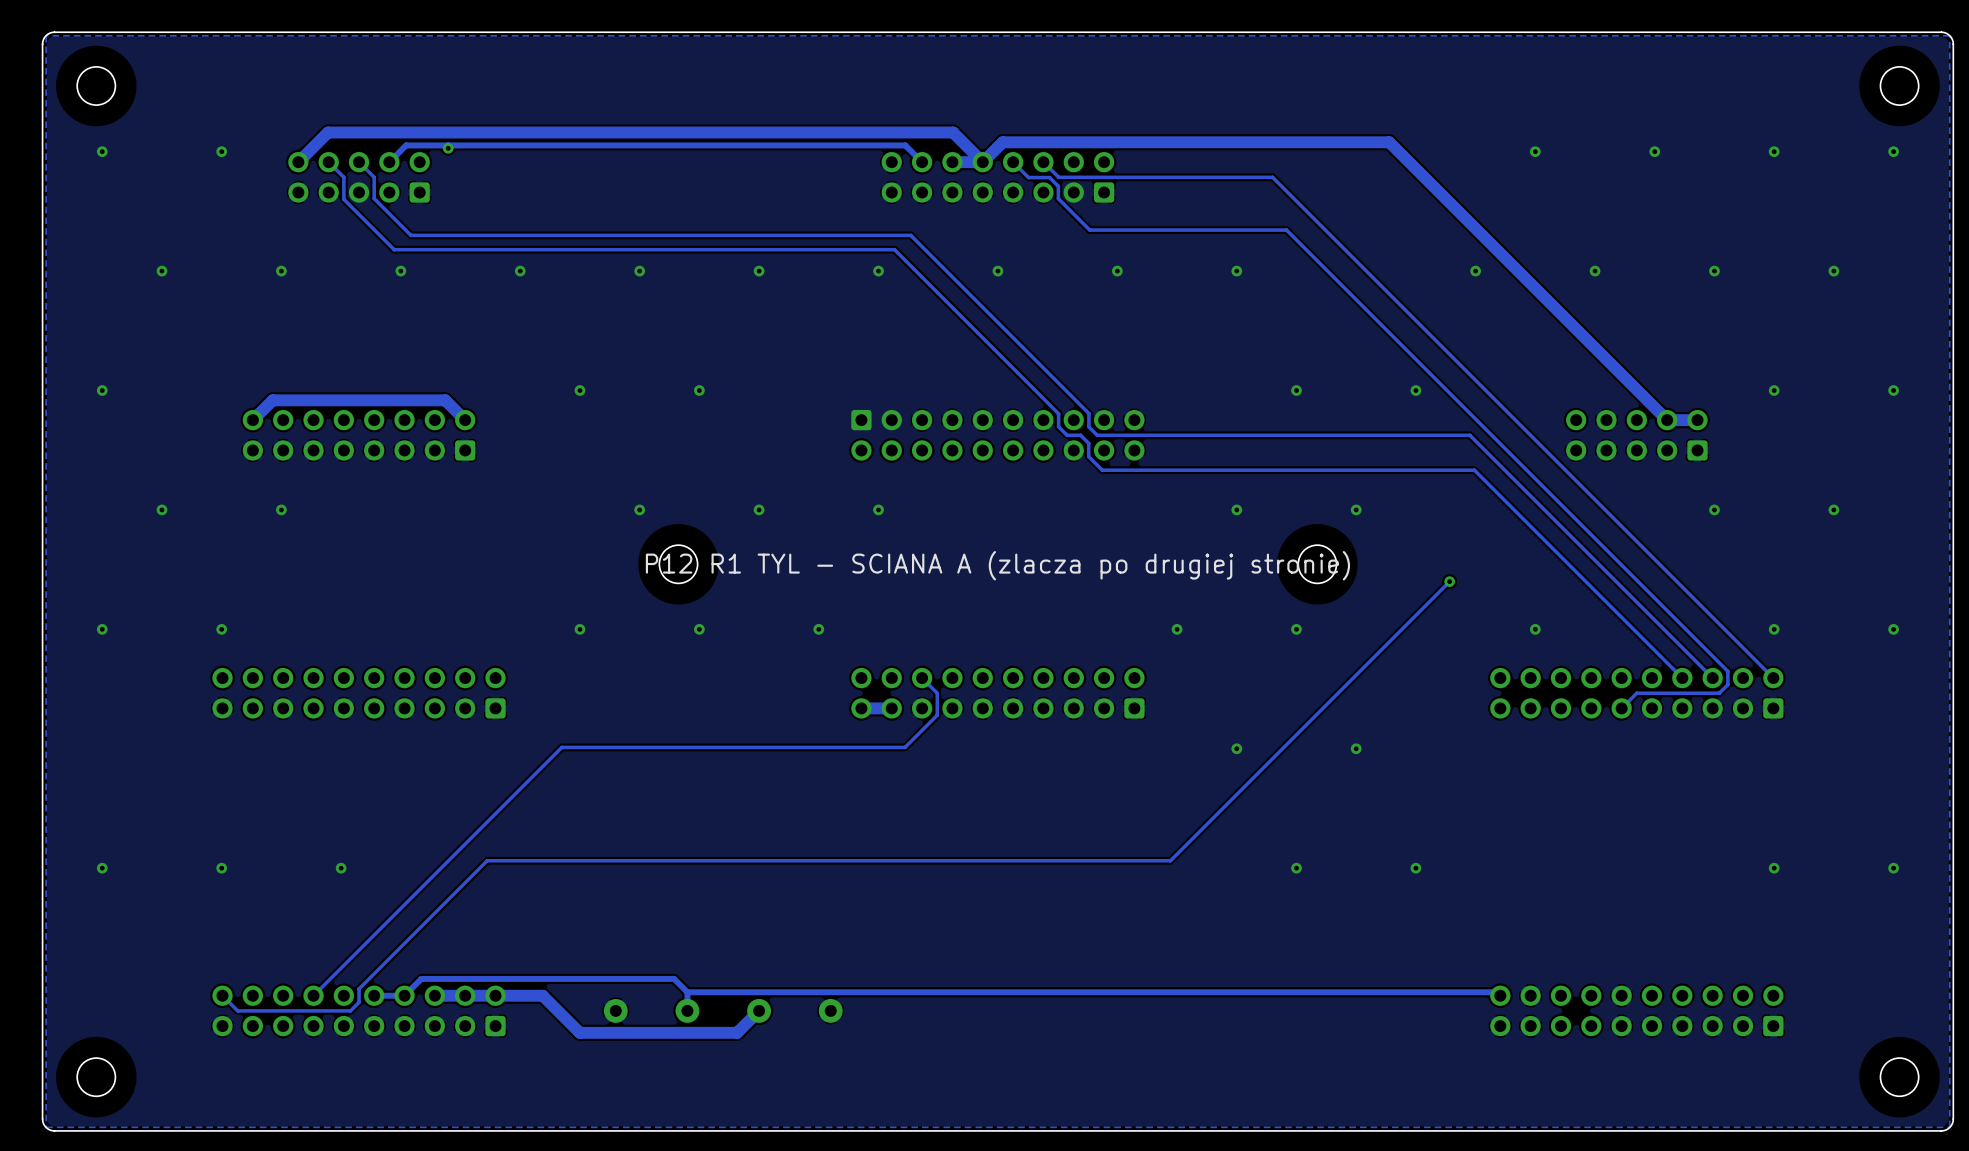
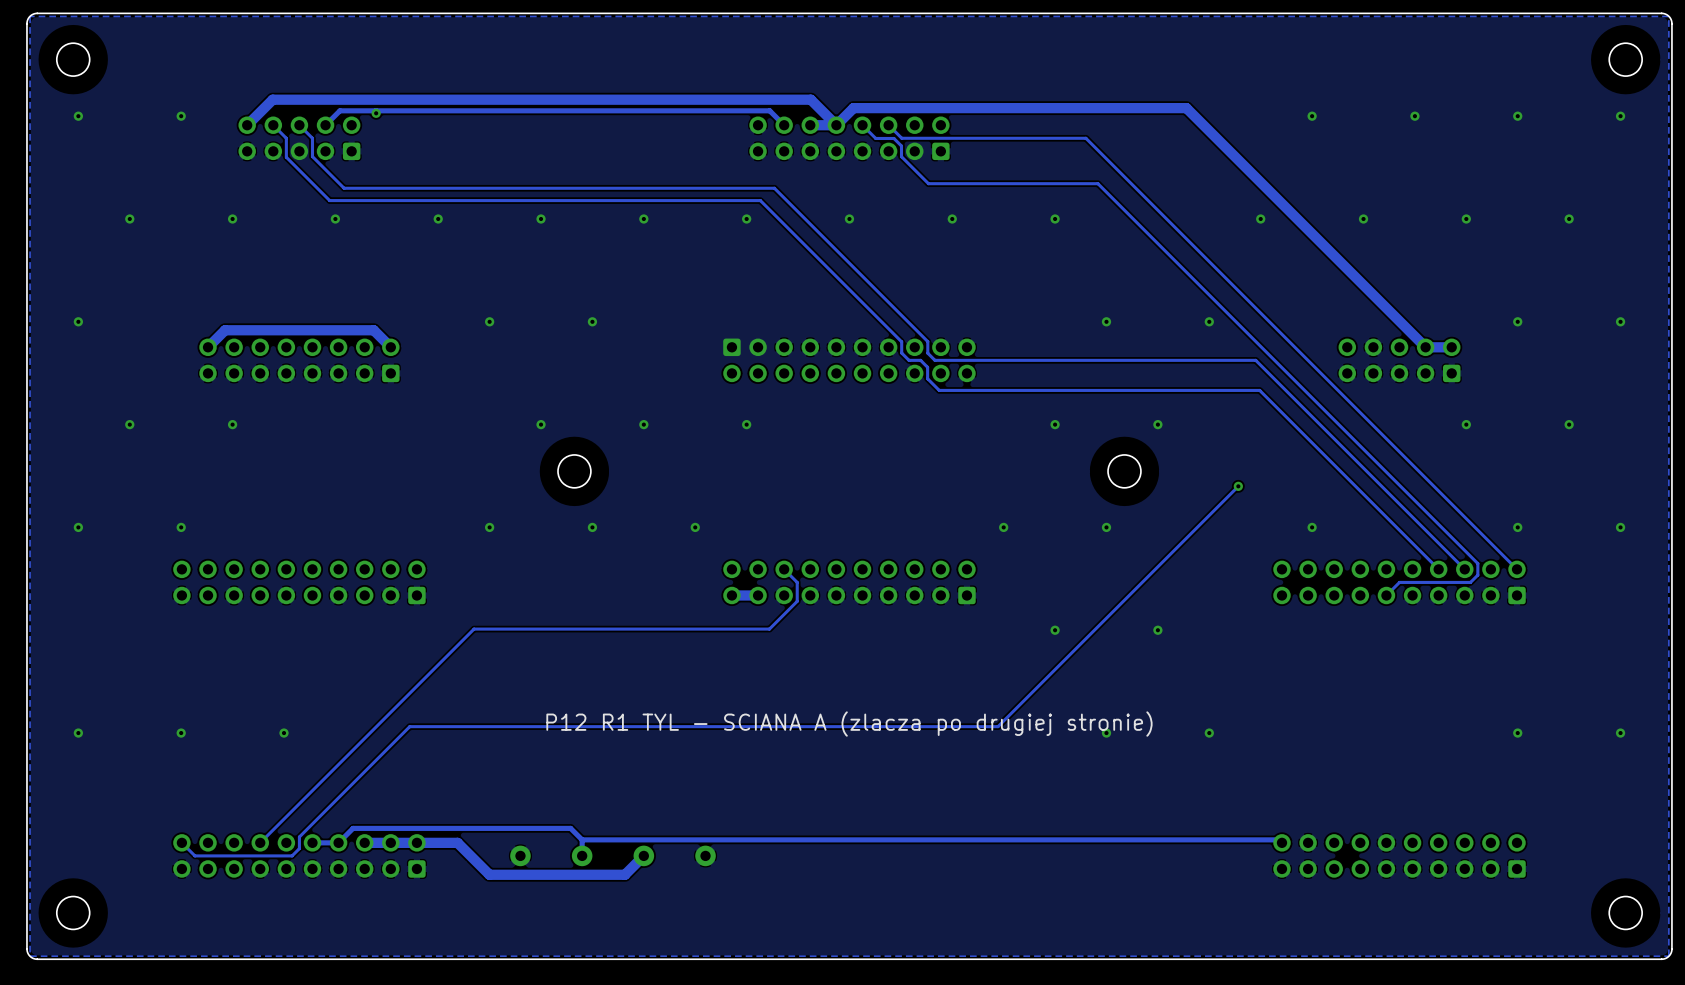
text position: P12 R1 TYL - SCIANA A (zlacza po drugiej stronie) (997, 565) -> P12 R1 TYL - SCIANA A (zlacza po drugiej stronie) (849, 724)

